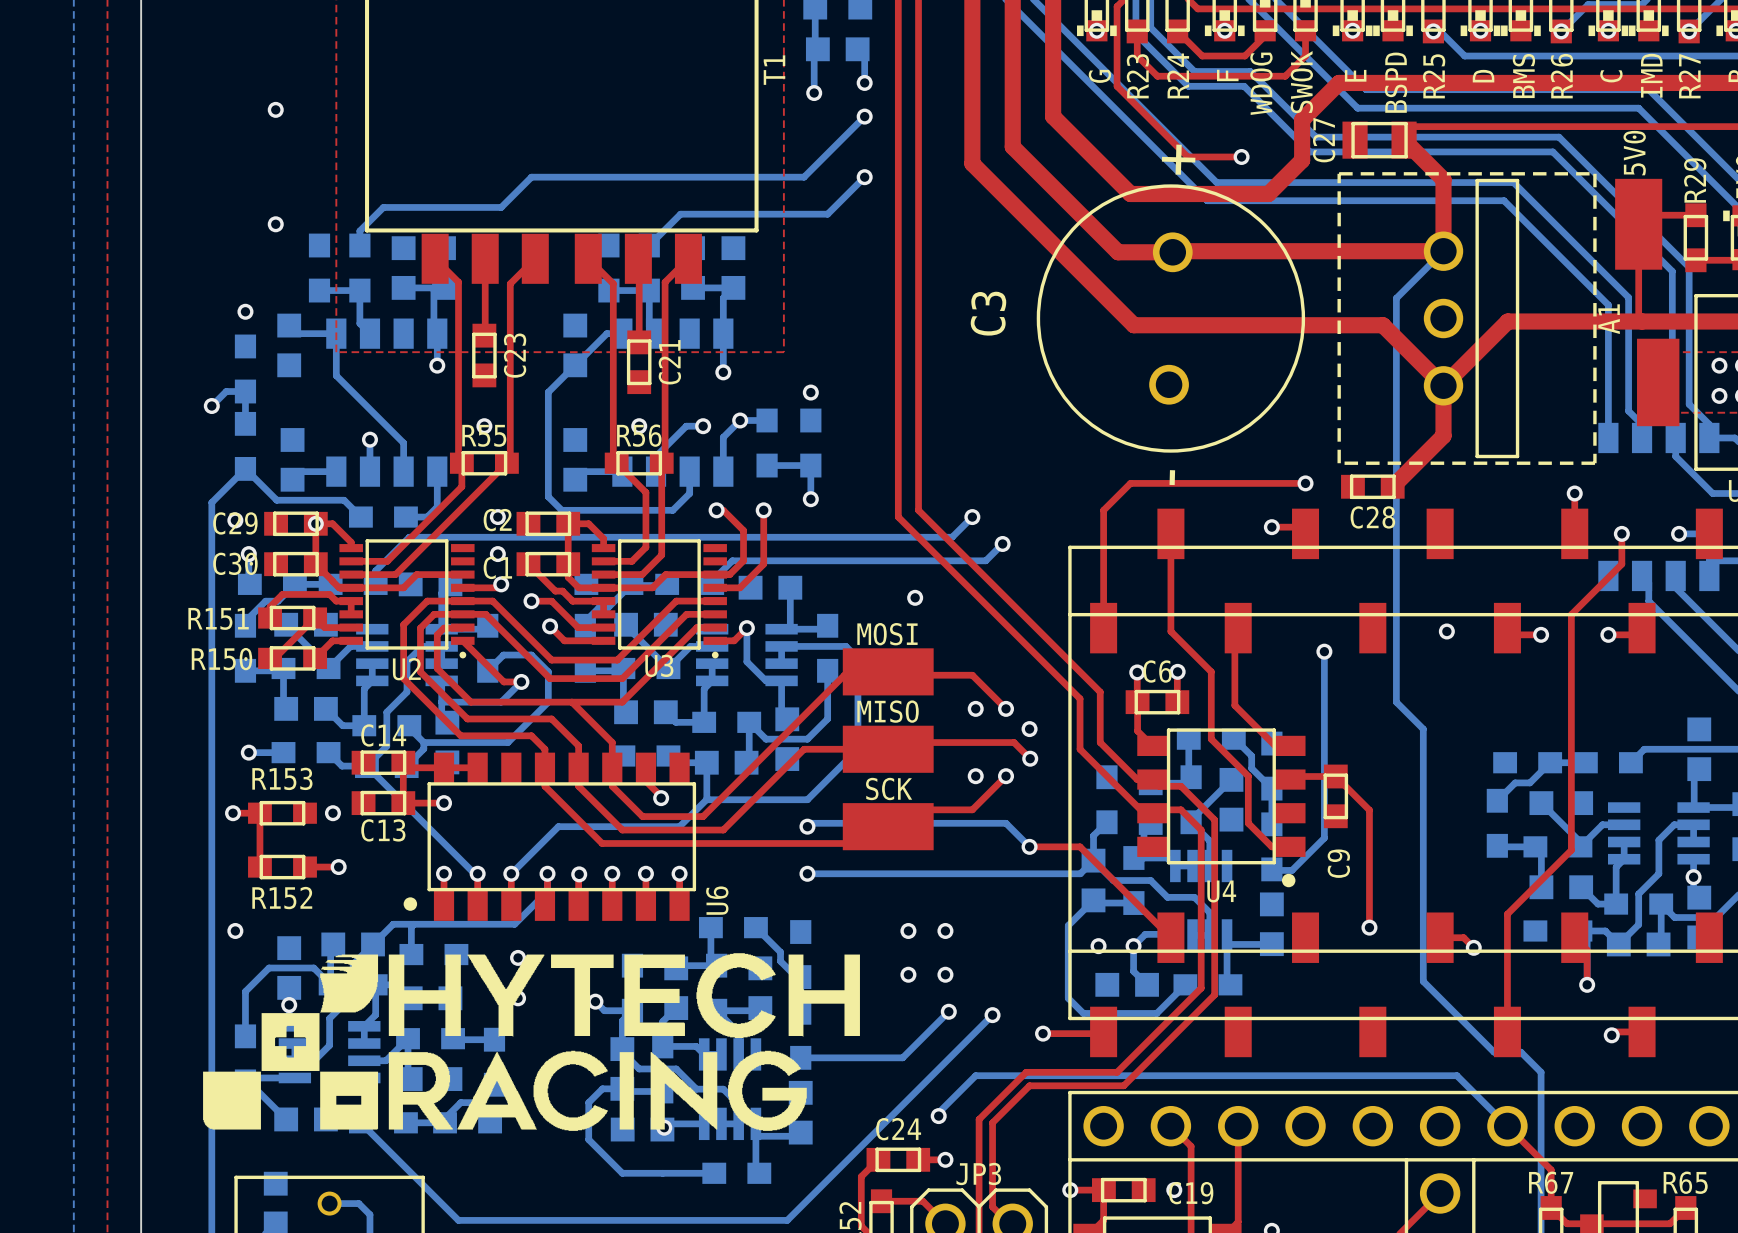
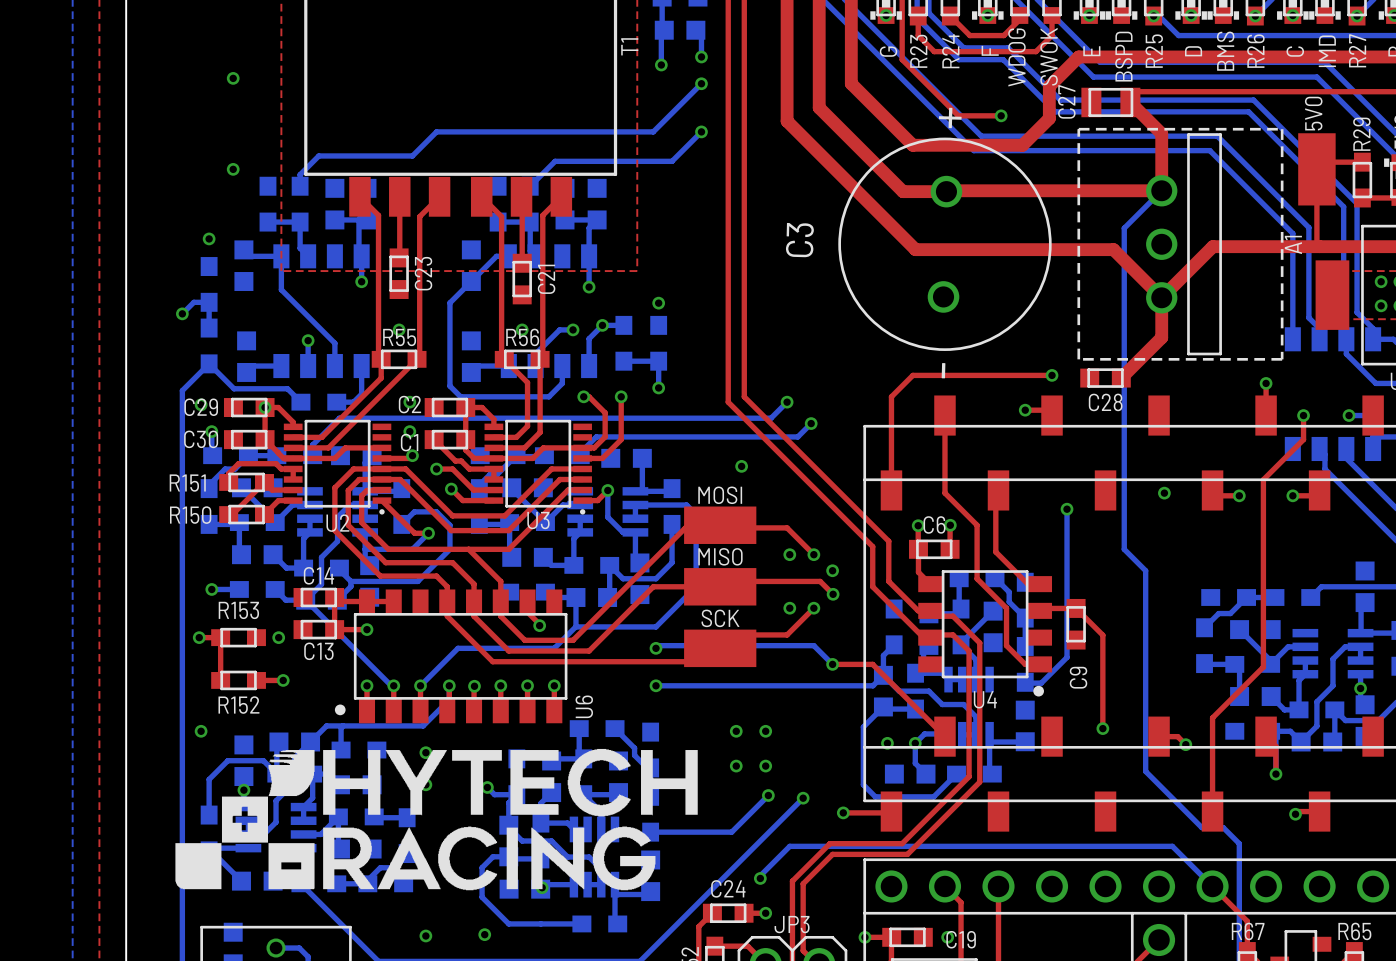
via: none -> (484, 934)
via: none -> (425, 935)

